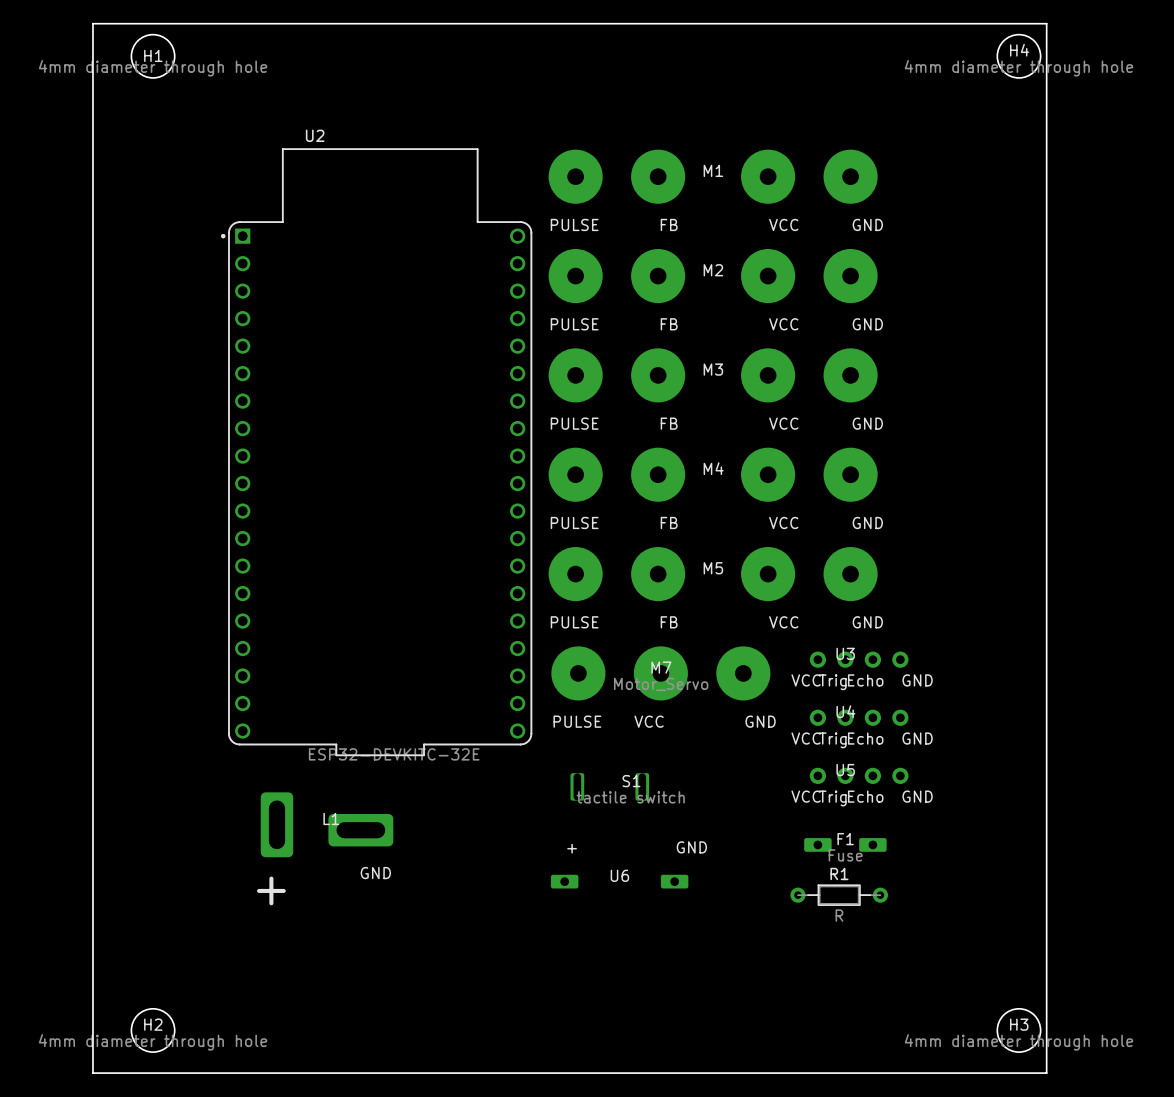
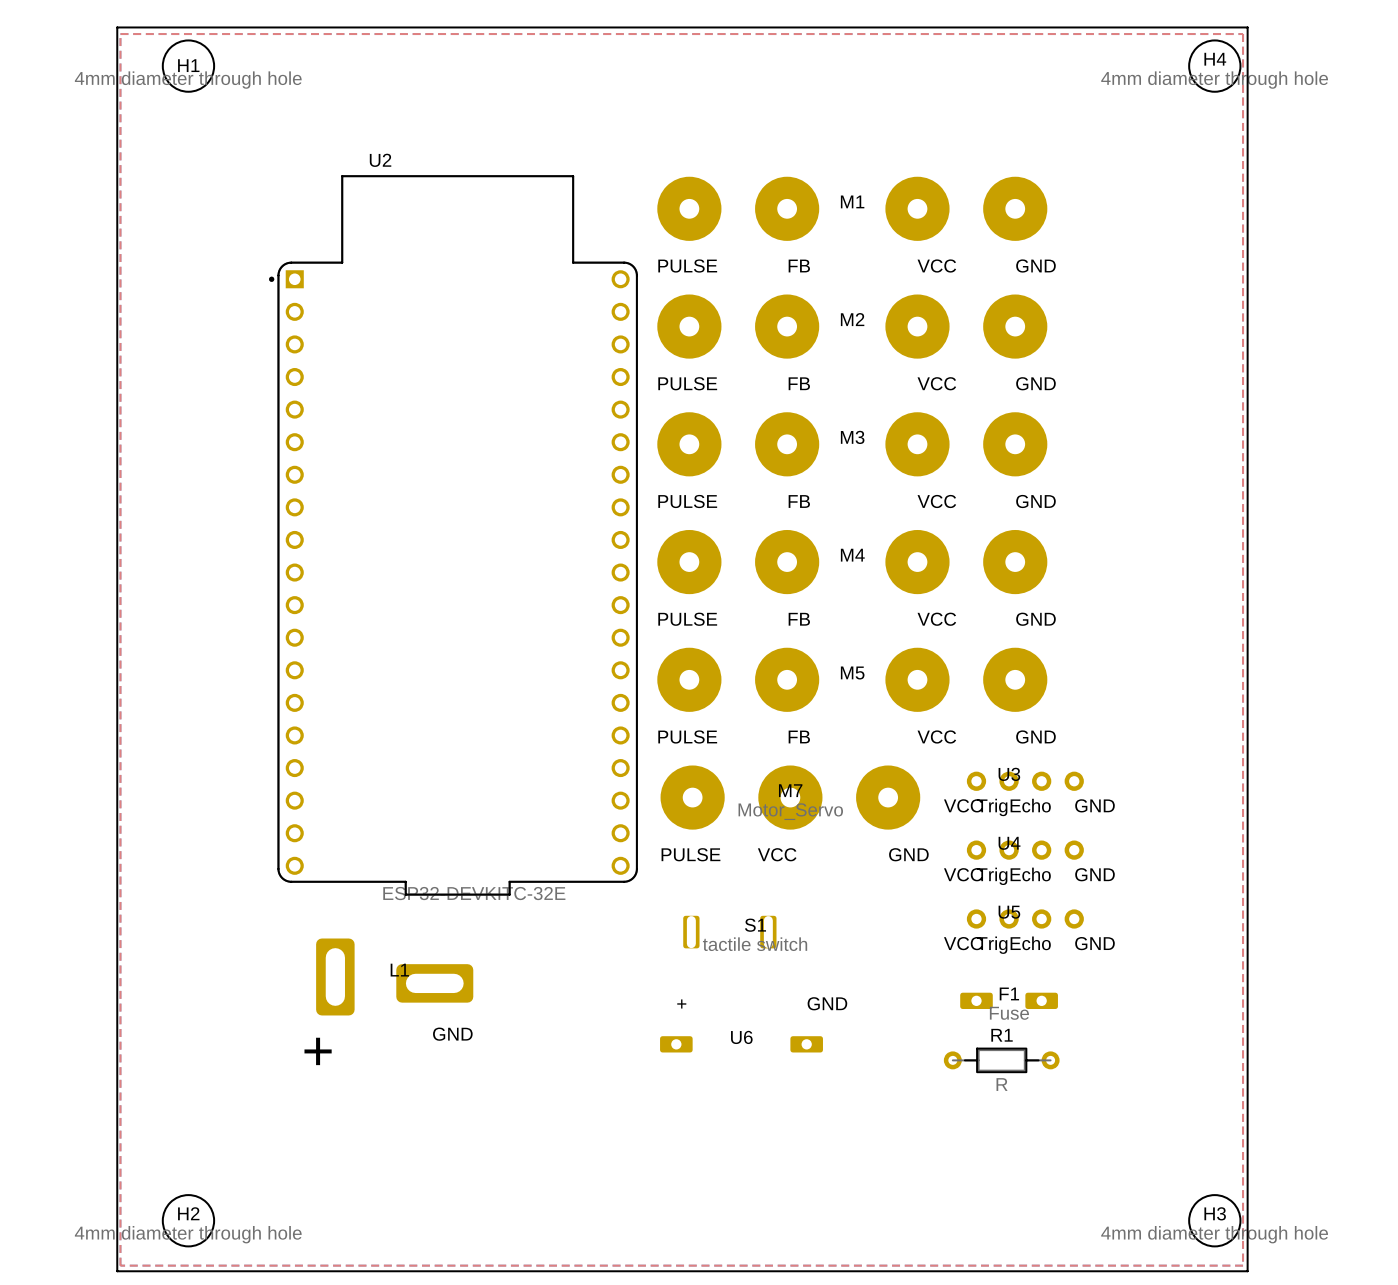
top zone outline: none -> (120, 34) (1243, 34) (1243, 1265) (120, 1265) (120, 34)

